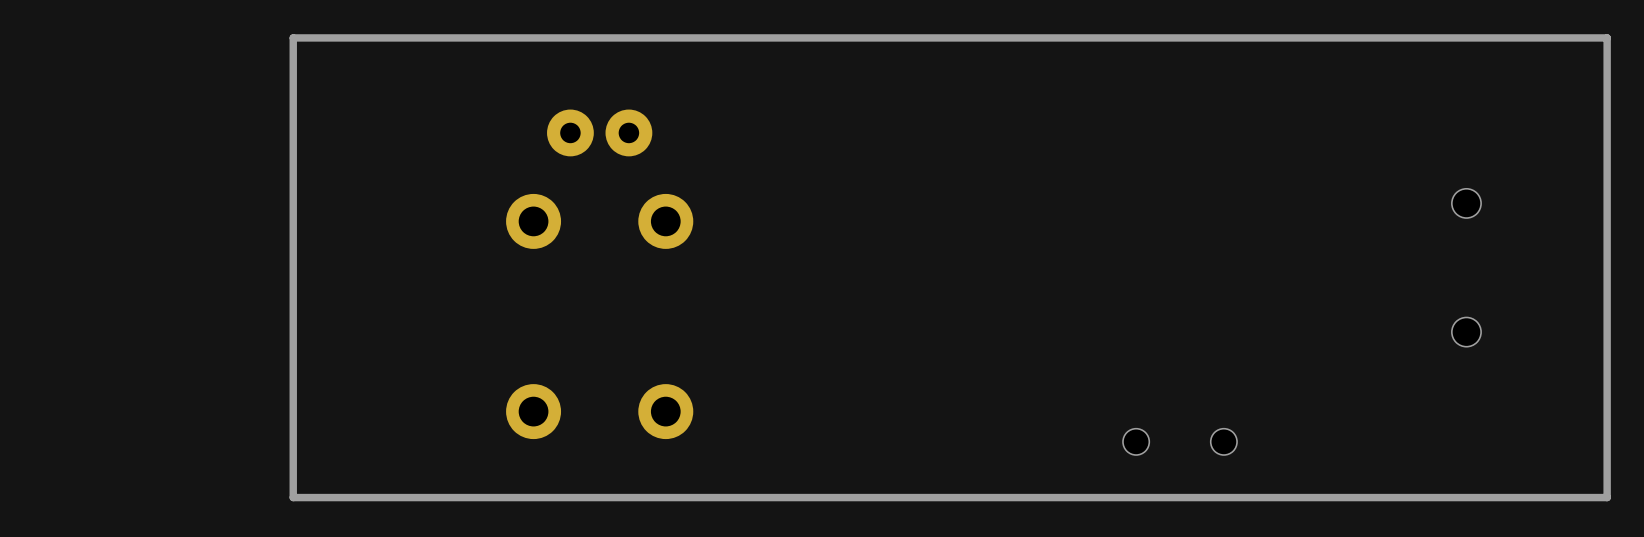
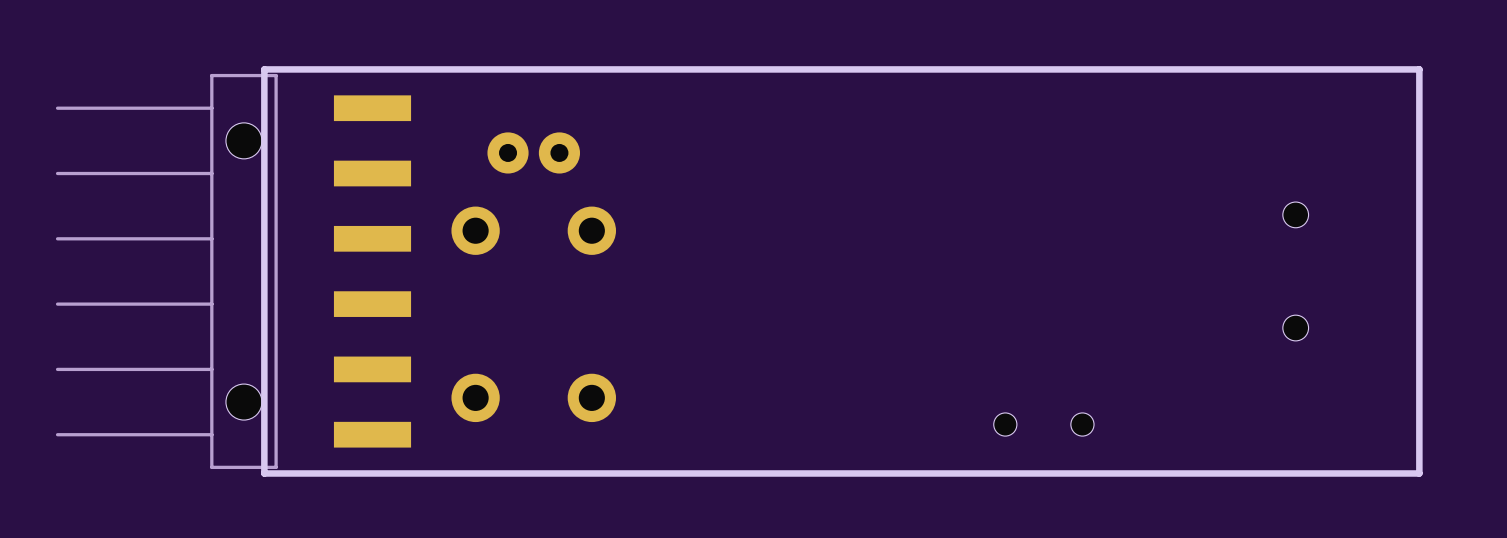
part: none -> (233, 271)

